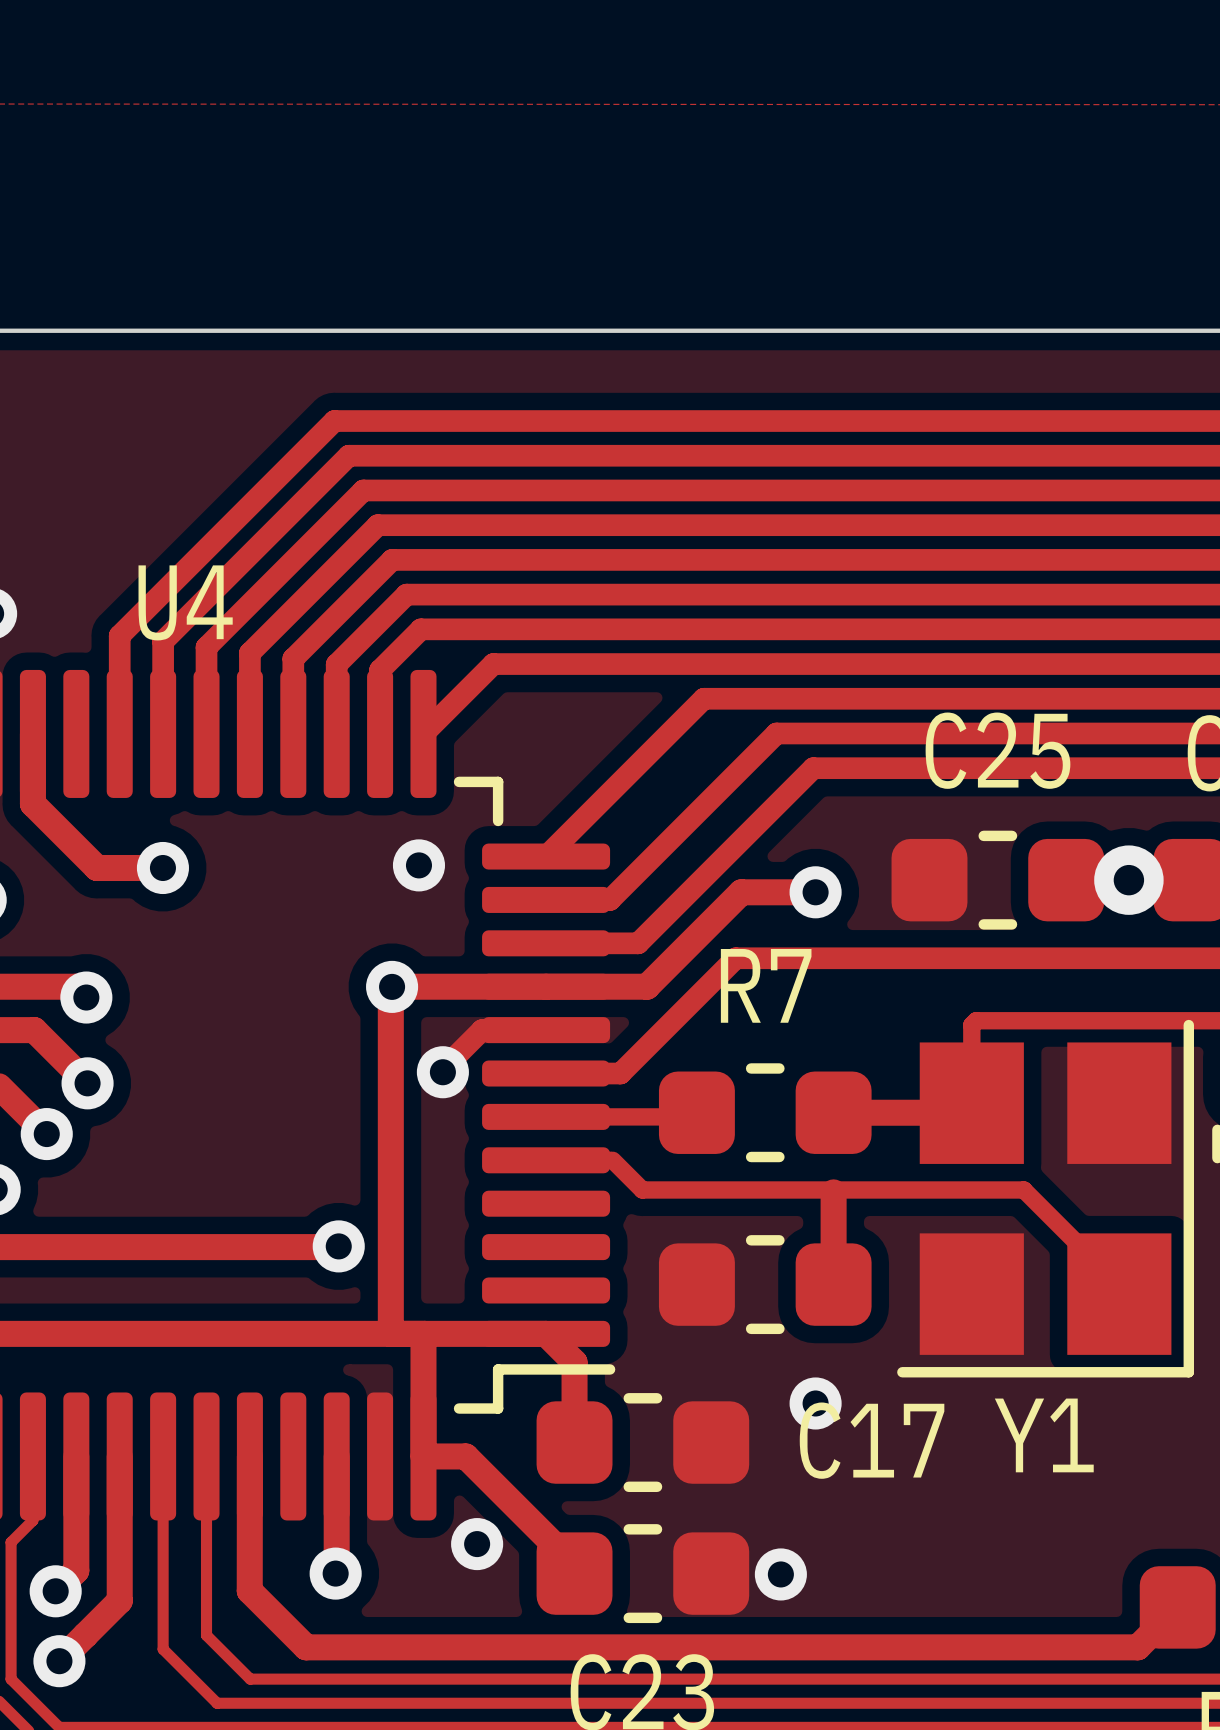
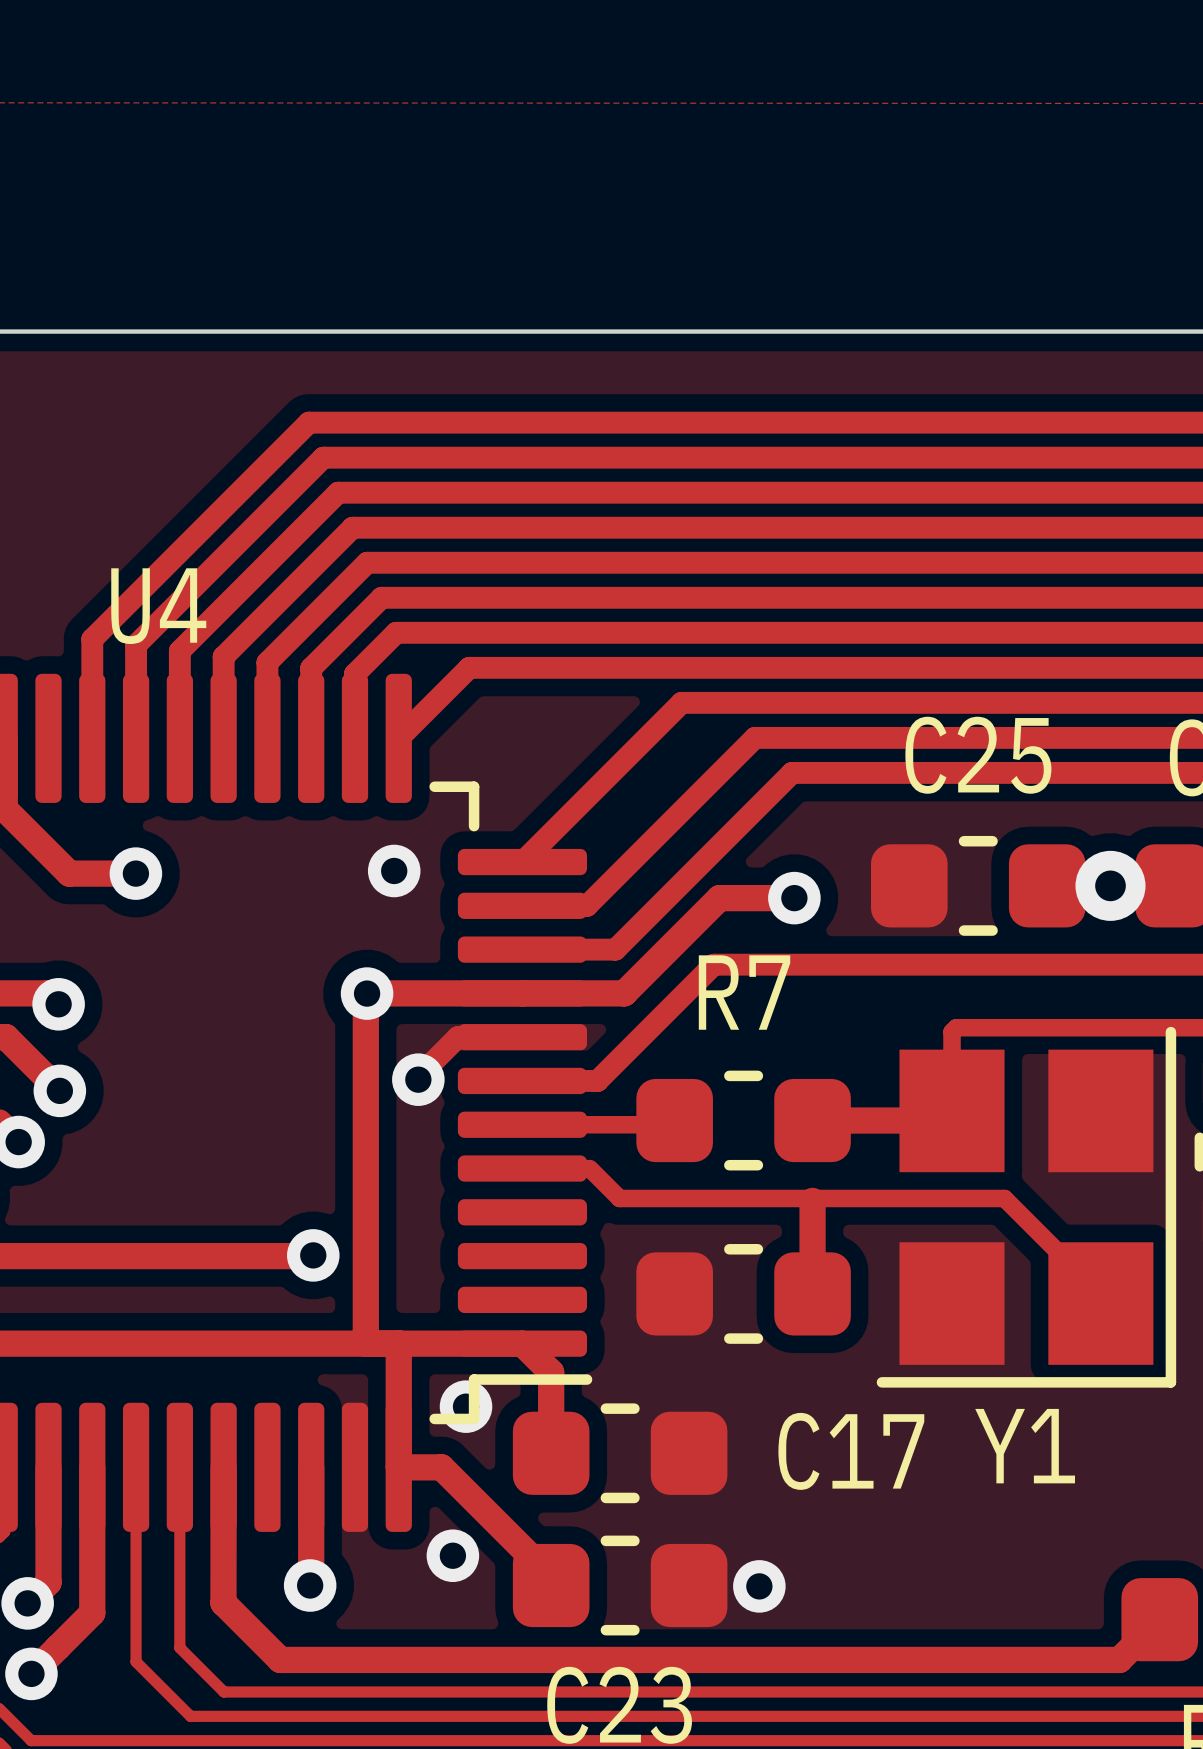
via position: (815, 1403) -> (466, 1406)

